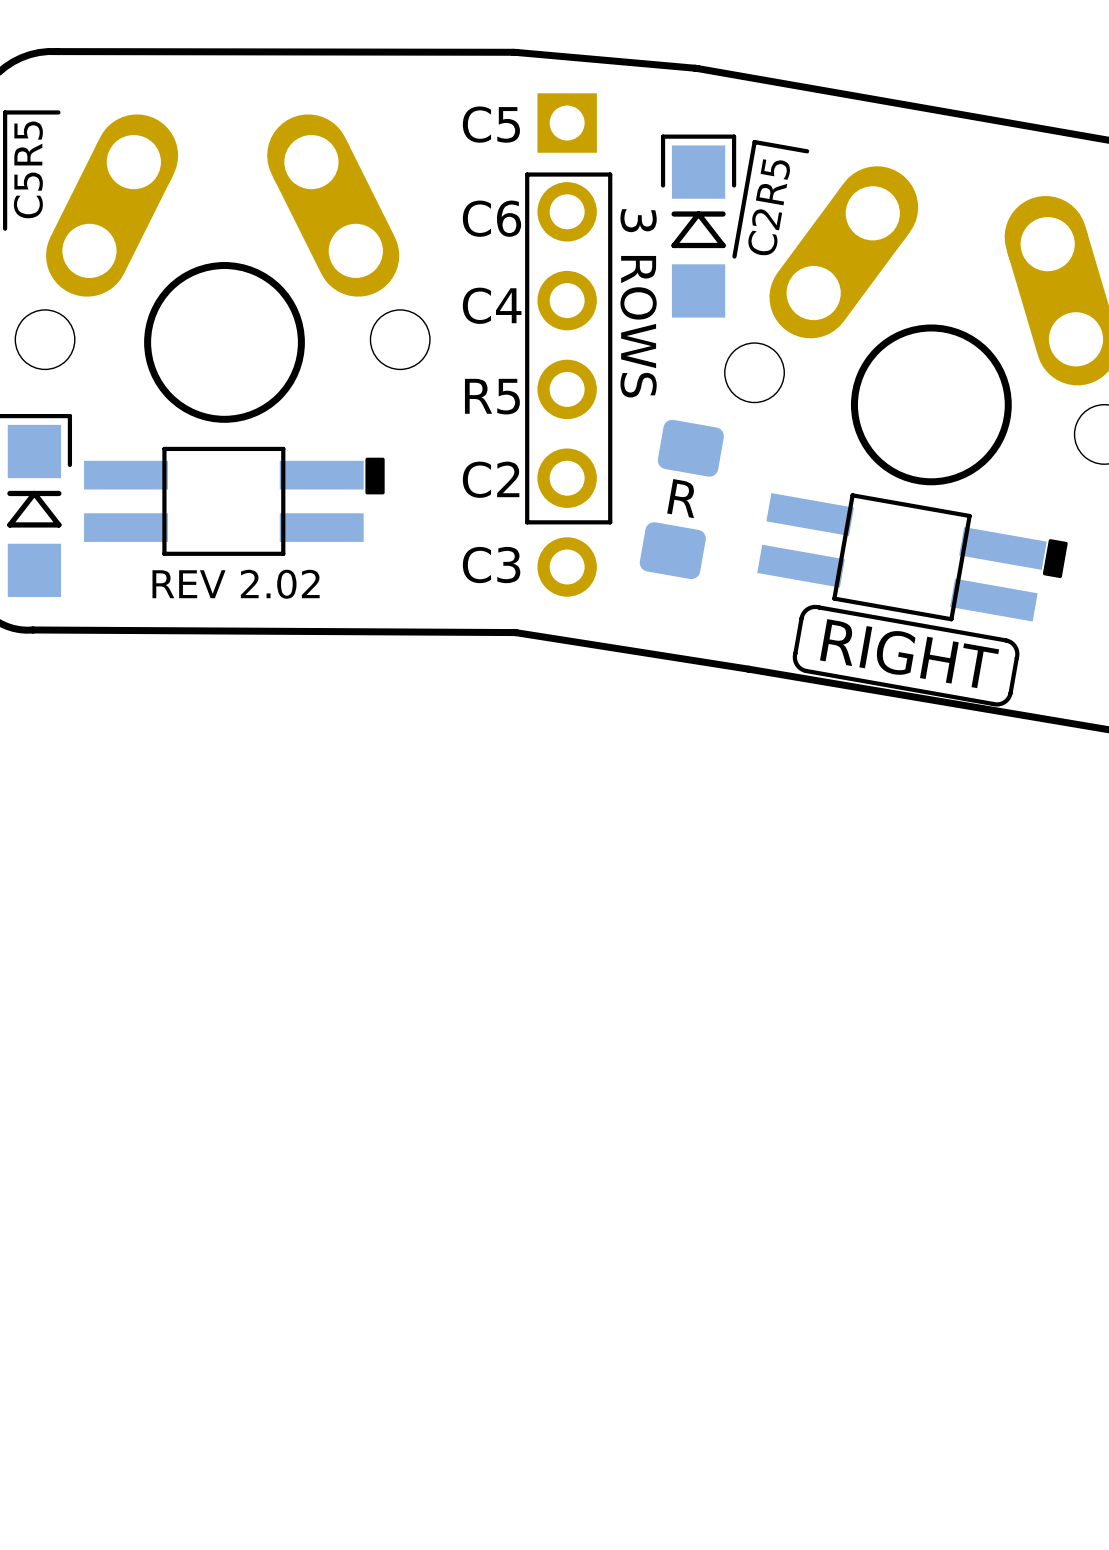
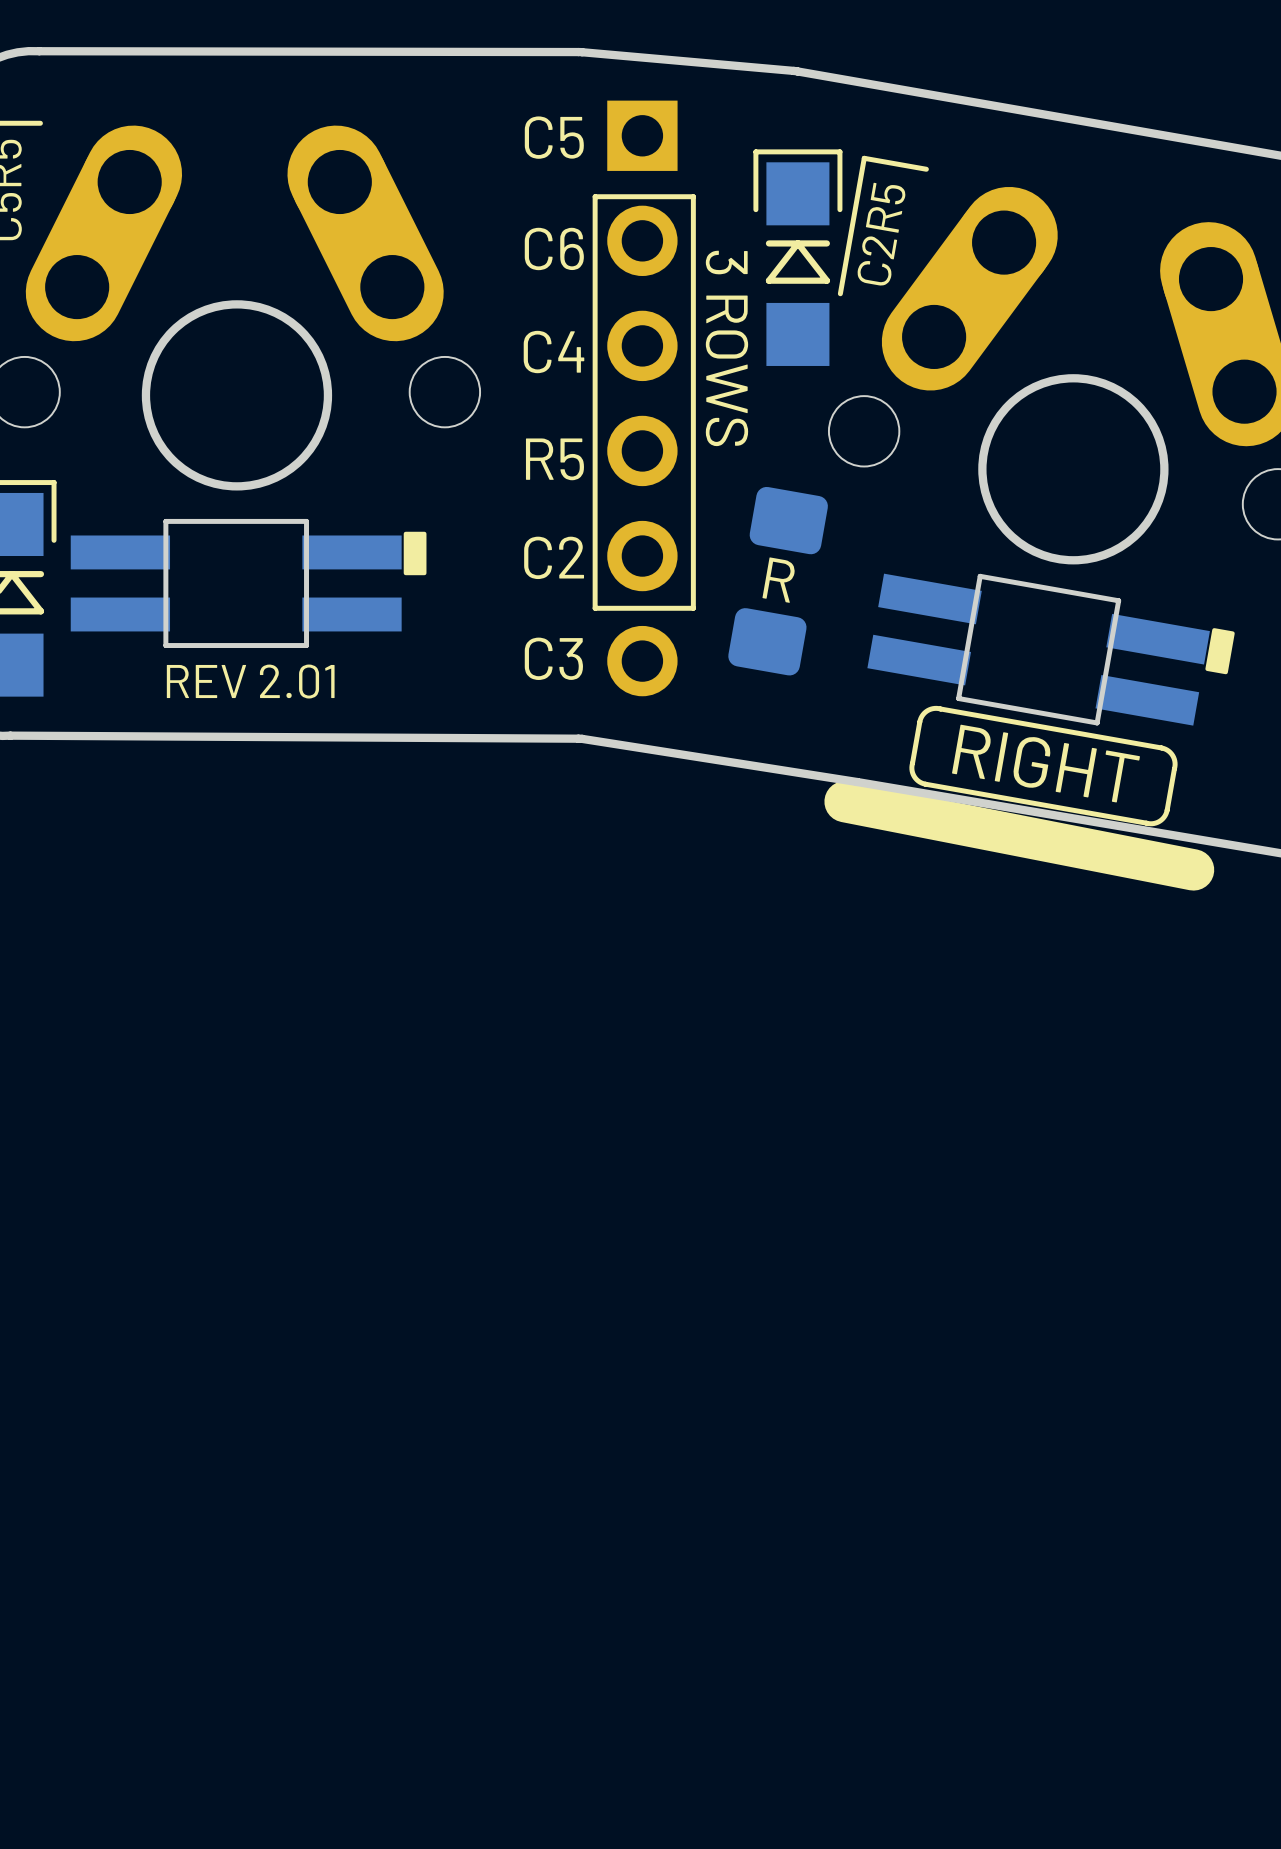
text: REV 2.02 (236, 584) -> REV 2.01 (250, 681)
line: none -> (845, 801) (1193, 869)

